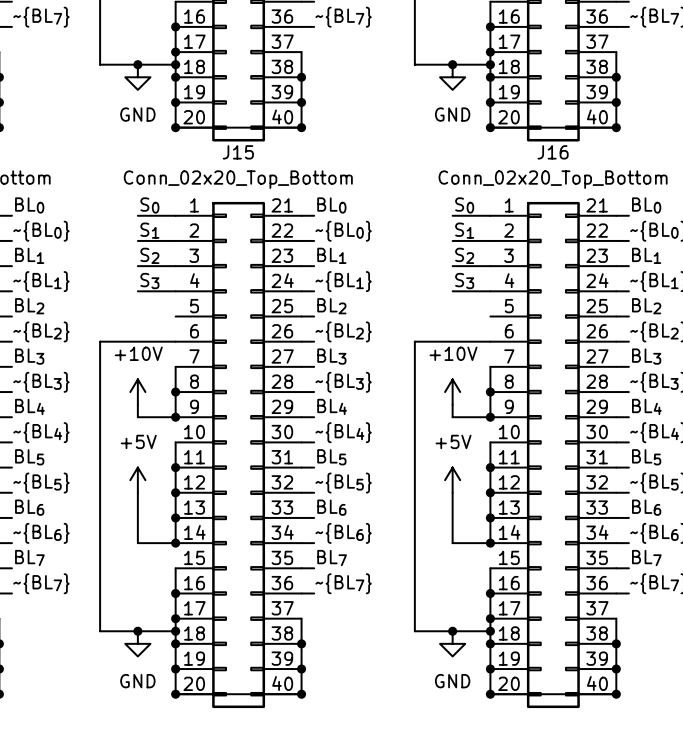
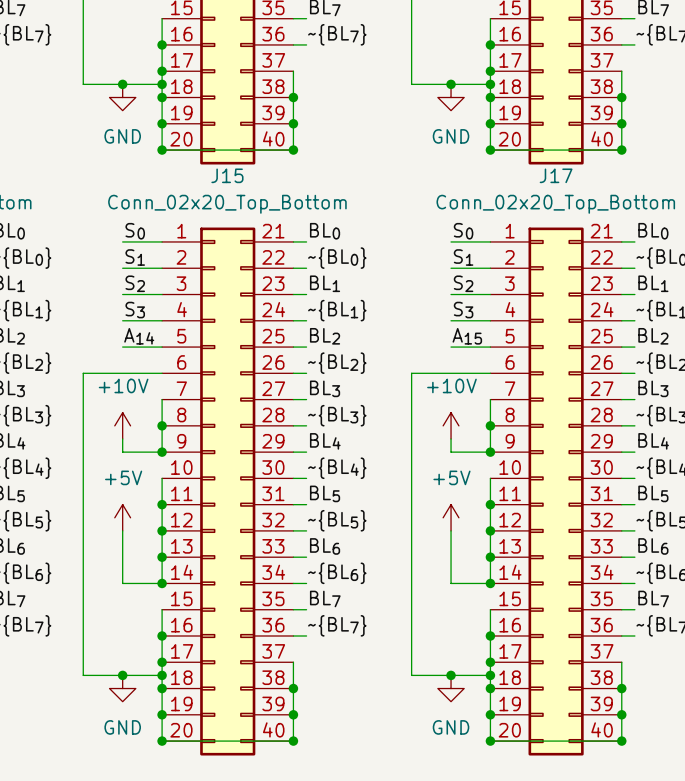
J16 name: J16 (553, 152) -> J17 (556, 175)
label: none -> A14 (139, 336)
label: none -> A15 (467, 336)
wire: none -> (122, 347) (162, 347)
wire: none -> (451, 347) (490, 347)

